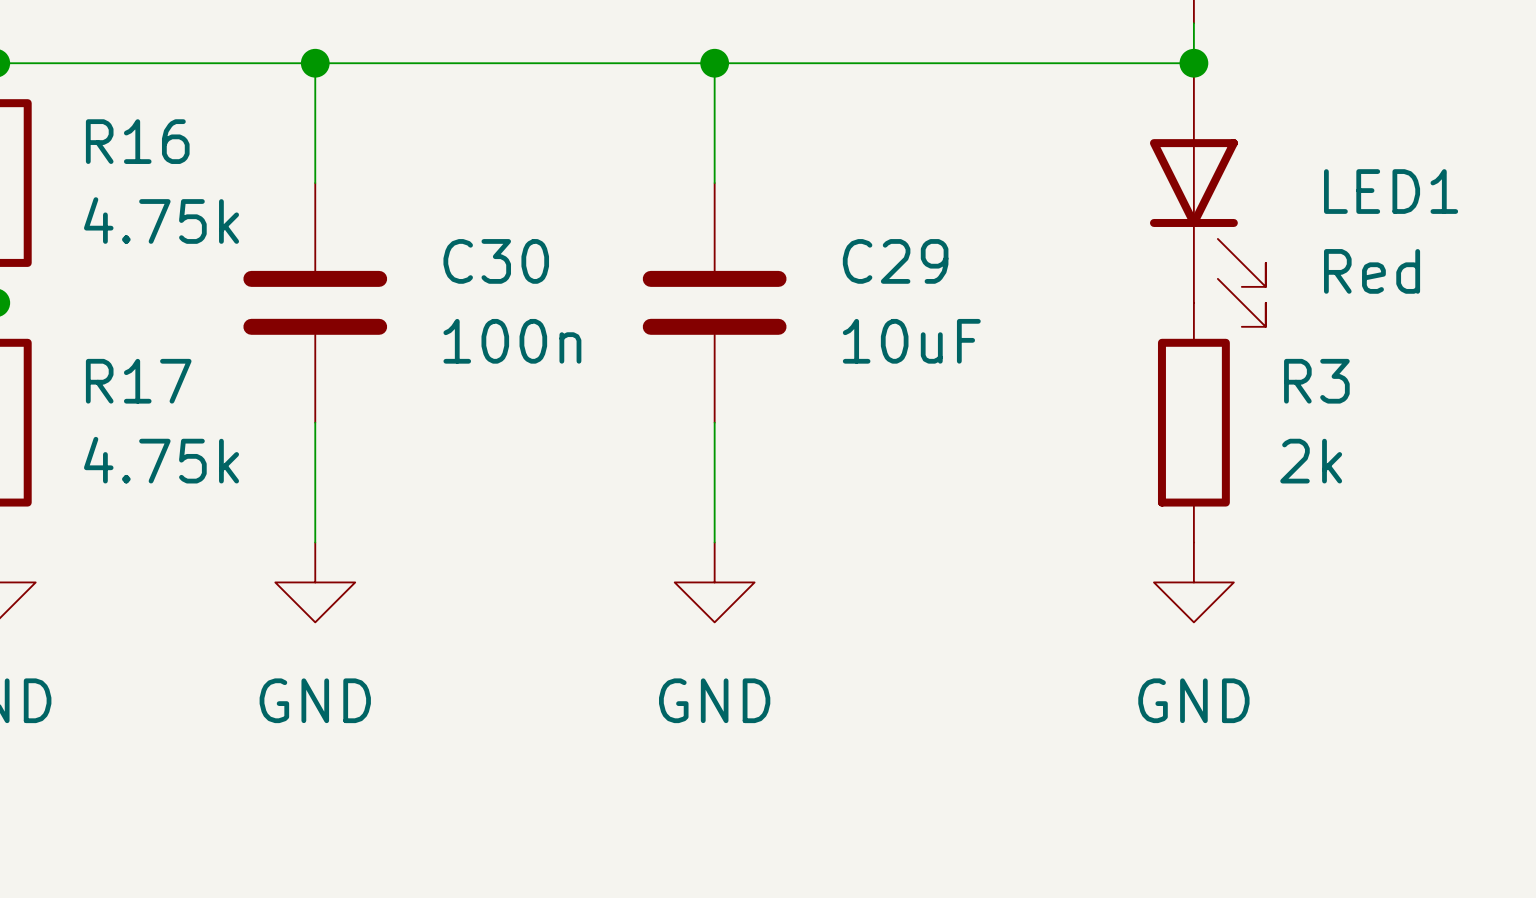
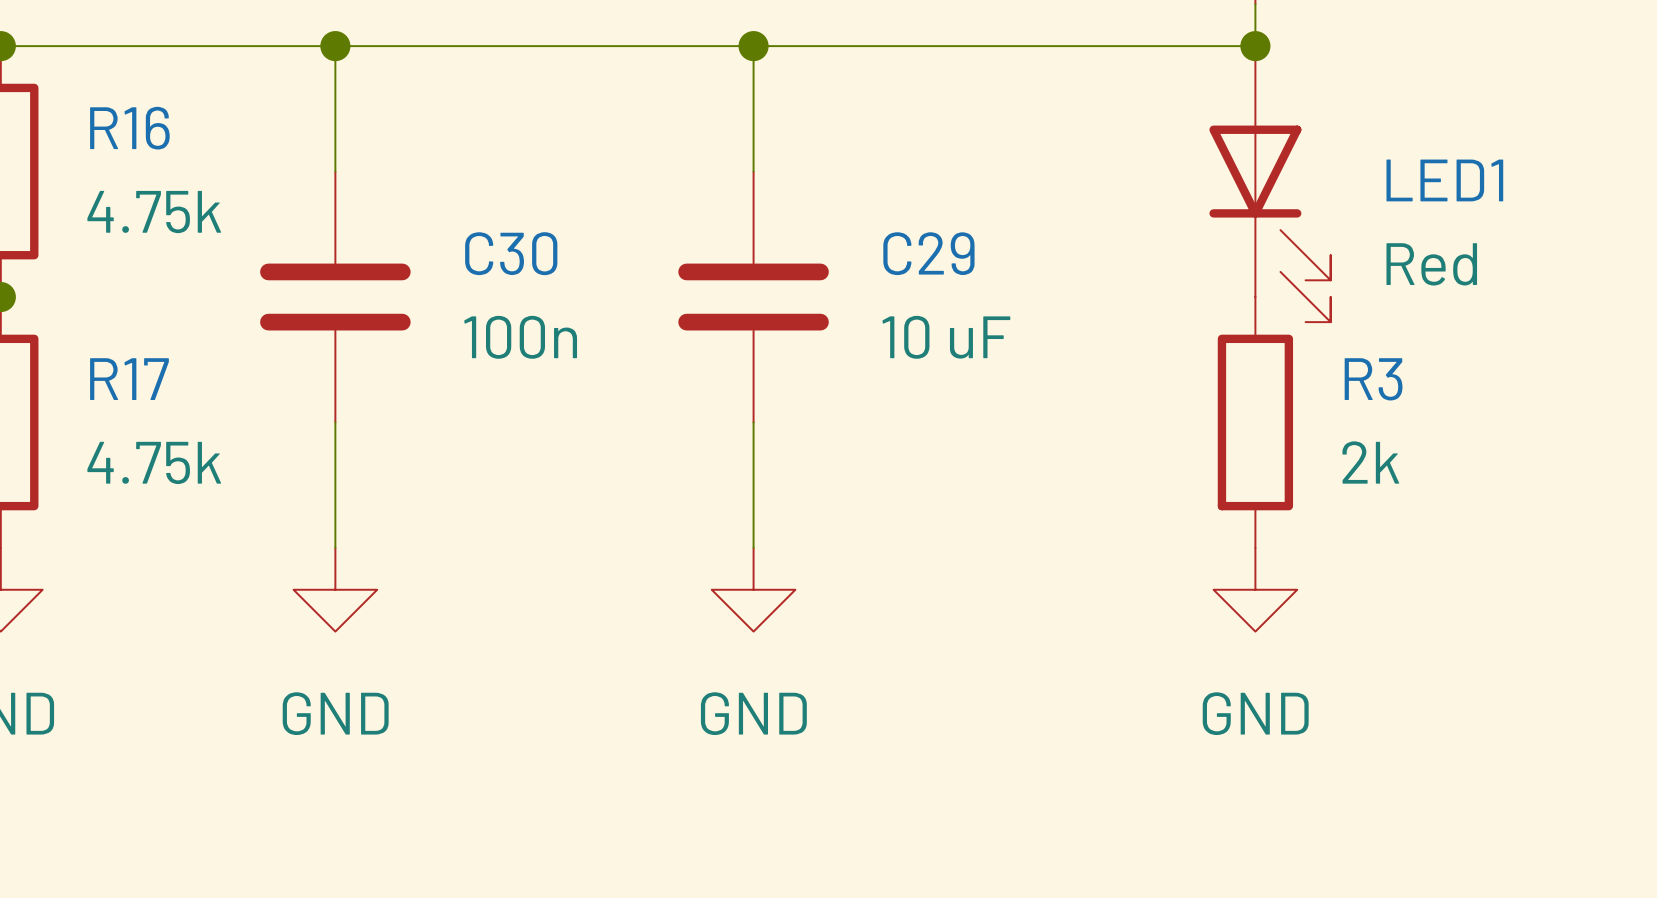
C29 value: 10uF (911, 341) -> 10 uF (946, 337)

